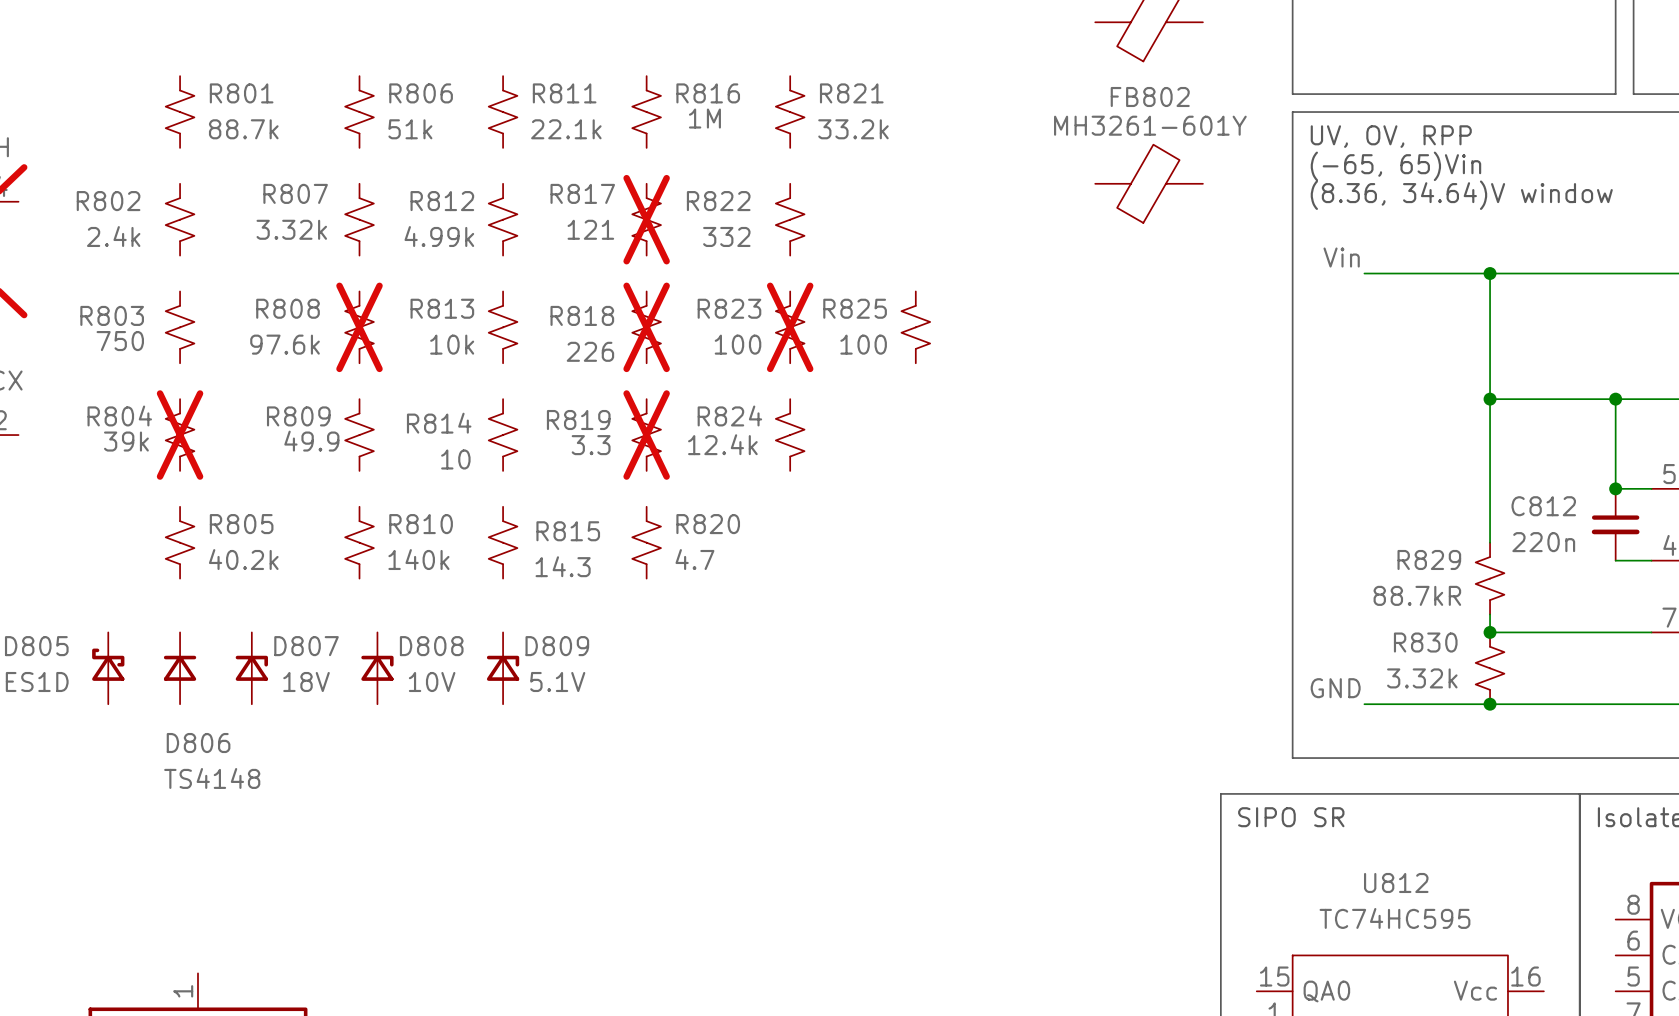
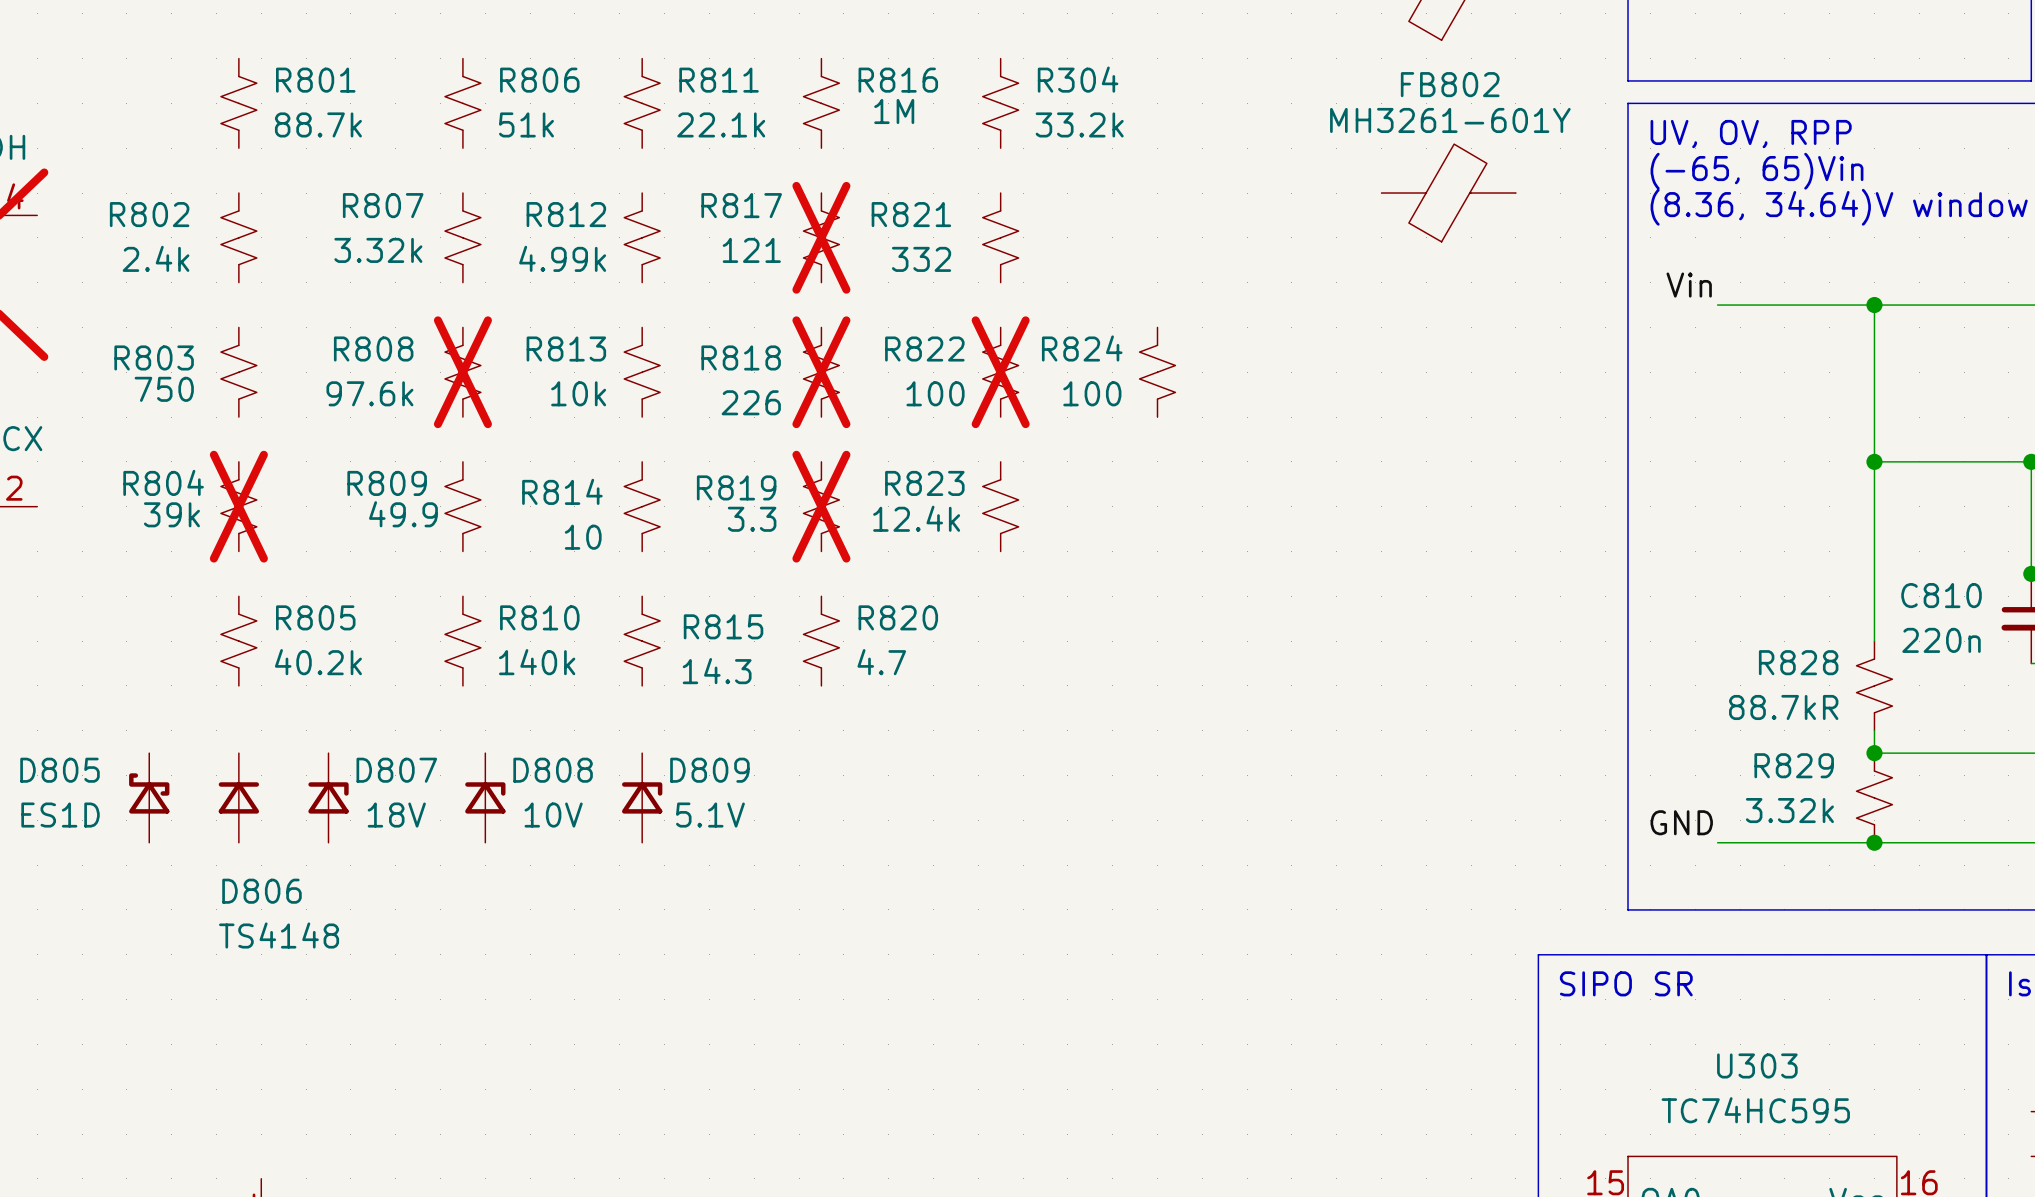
R821 name: R821 (851, 93) -> R304 (1078, 79)
R822 name: R822 (718, 201) -> R821 (911, 214)
R823 name: R823 (729, 308) -> R822 (924, 349)
R825 name: R825 (855, 308) -> R824 (1082, 348)
R824 name: R824 (729, 415) -> R823 (924, 483)
C812 name: C812 (1543, 506) -> C810 (1941, 595)
R829 name: R829 (1429, 559) -> R828 (1798, 662)
R830 name: R830 (1425, 642) -> R829 (1794, 765)
U812 name: U812 (1396, 882) -> U303 (1757, 1065)

